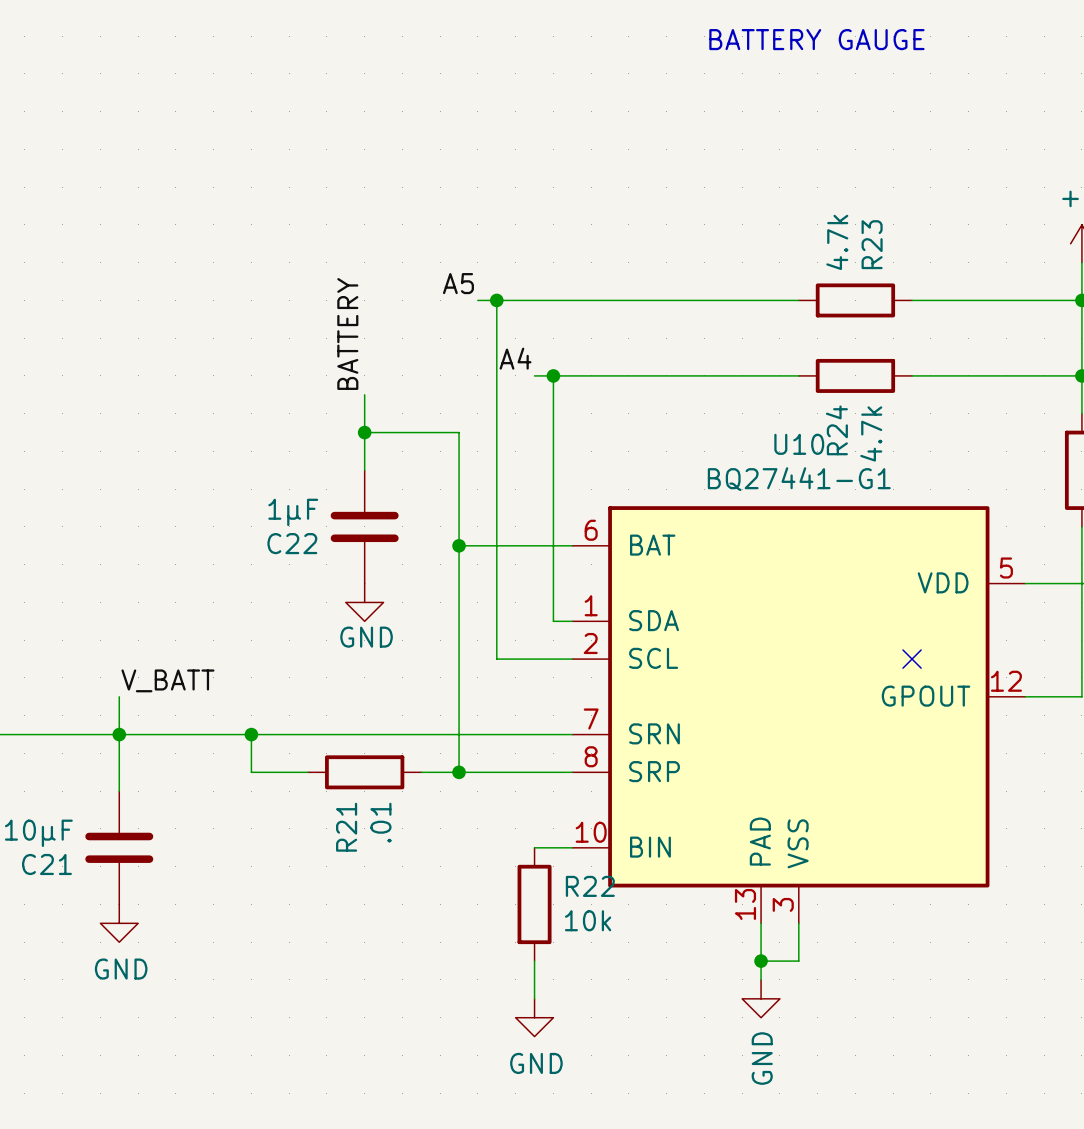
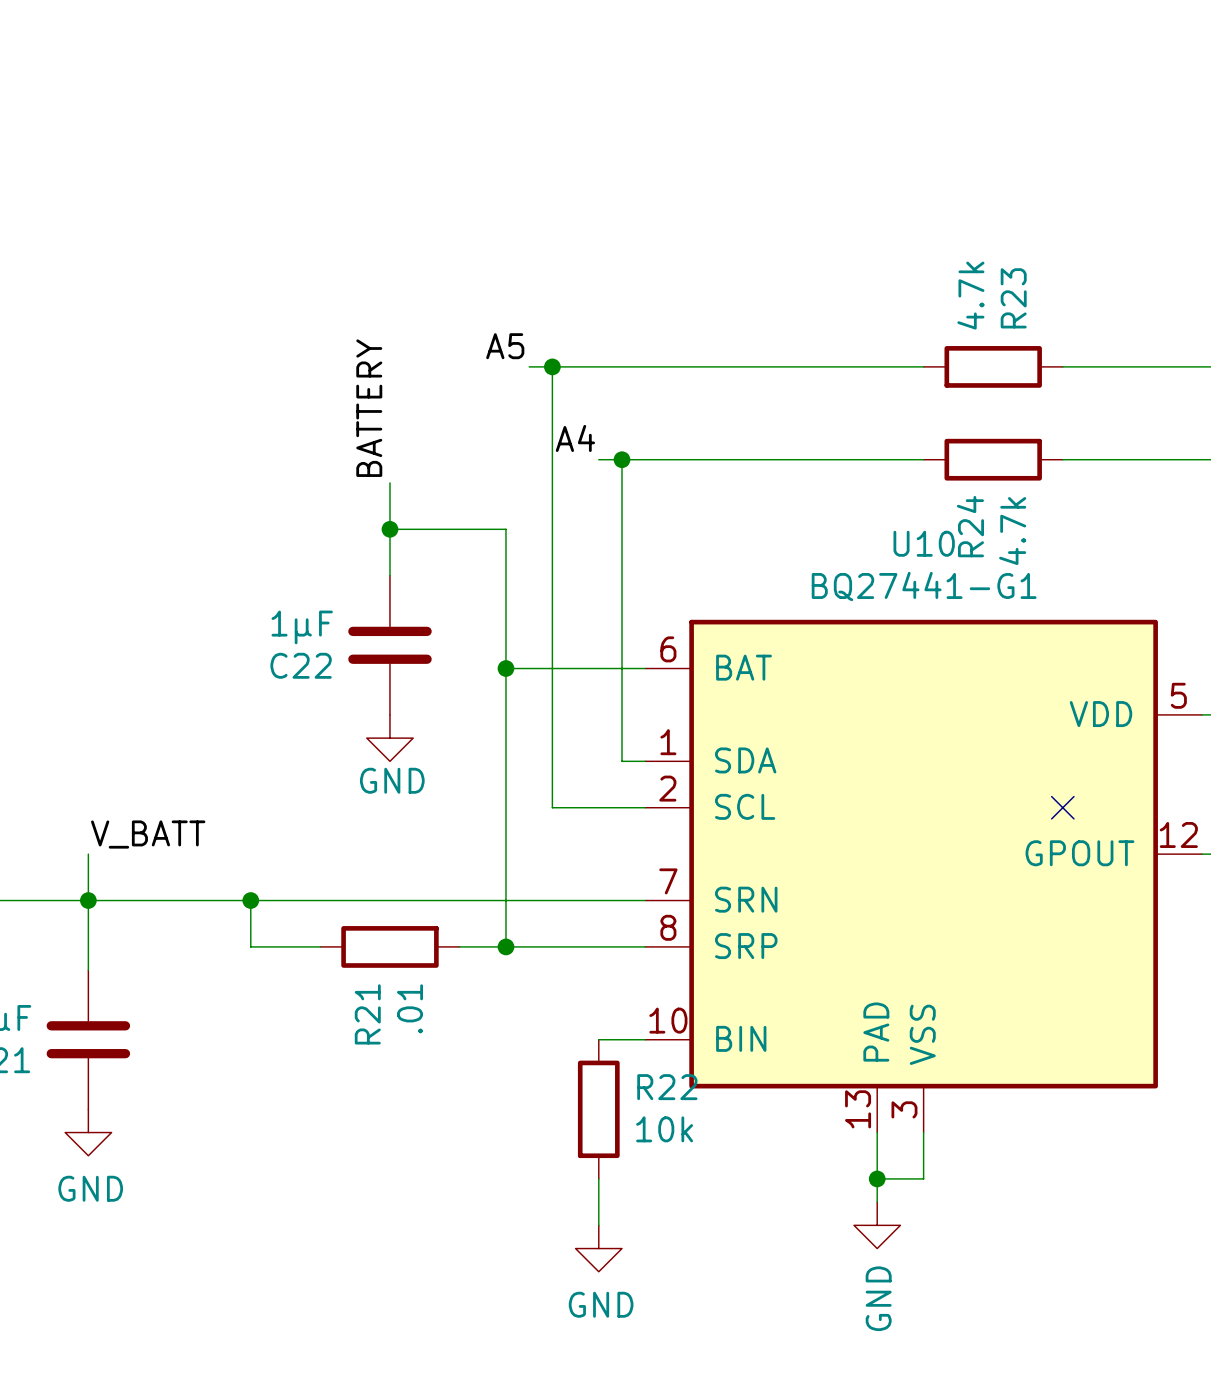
text: BATTERY GAUGE (816, 39) -> none

